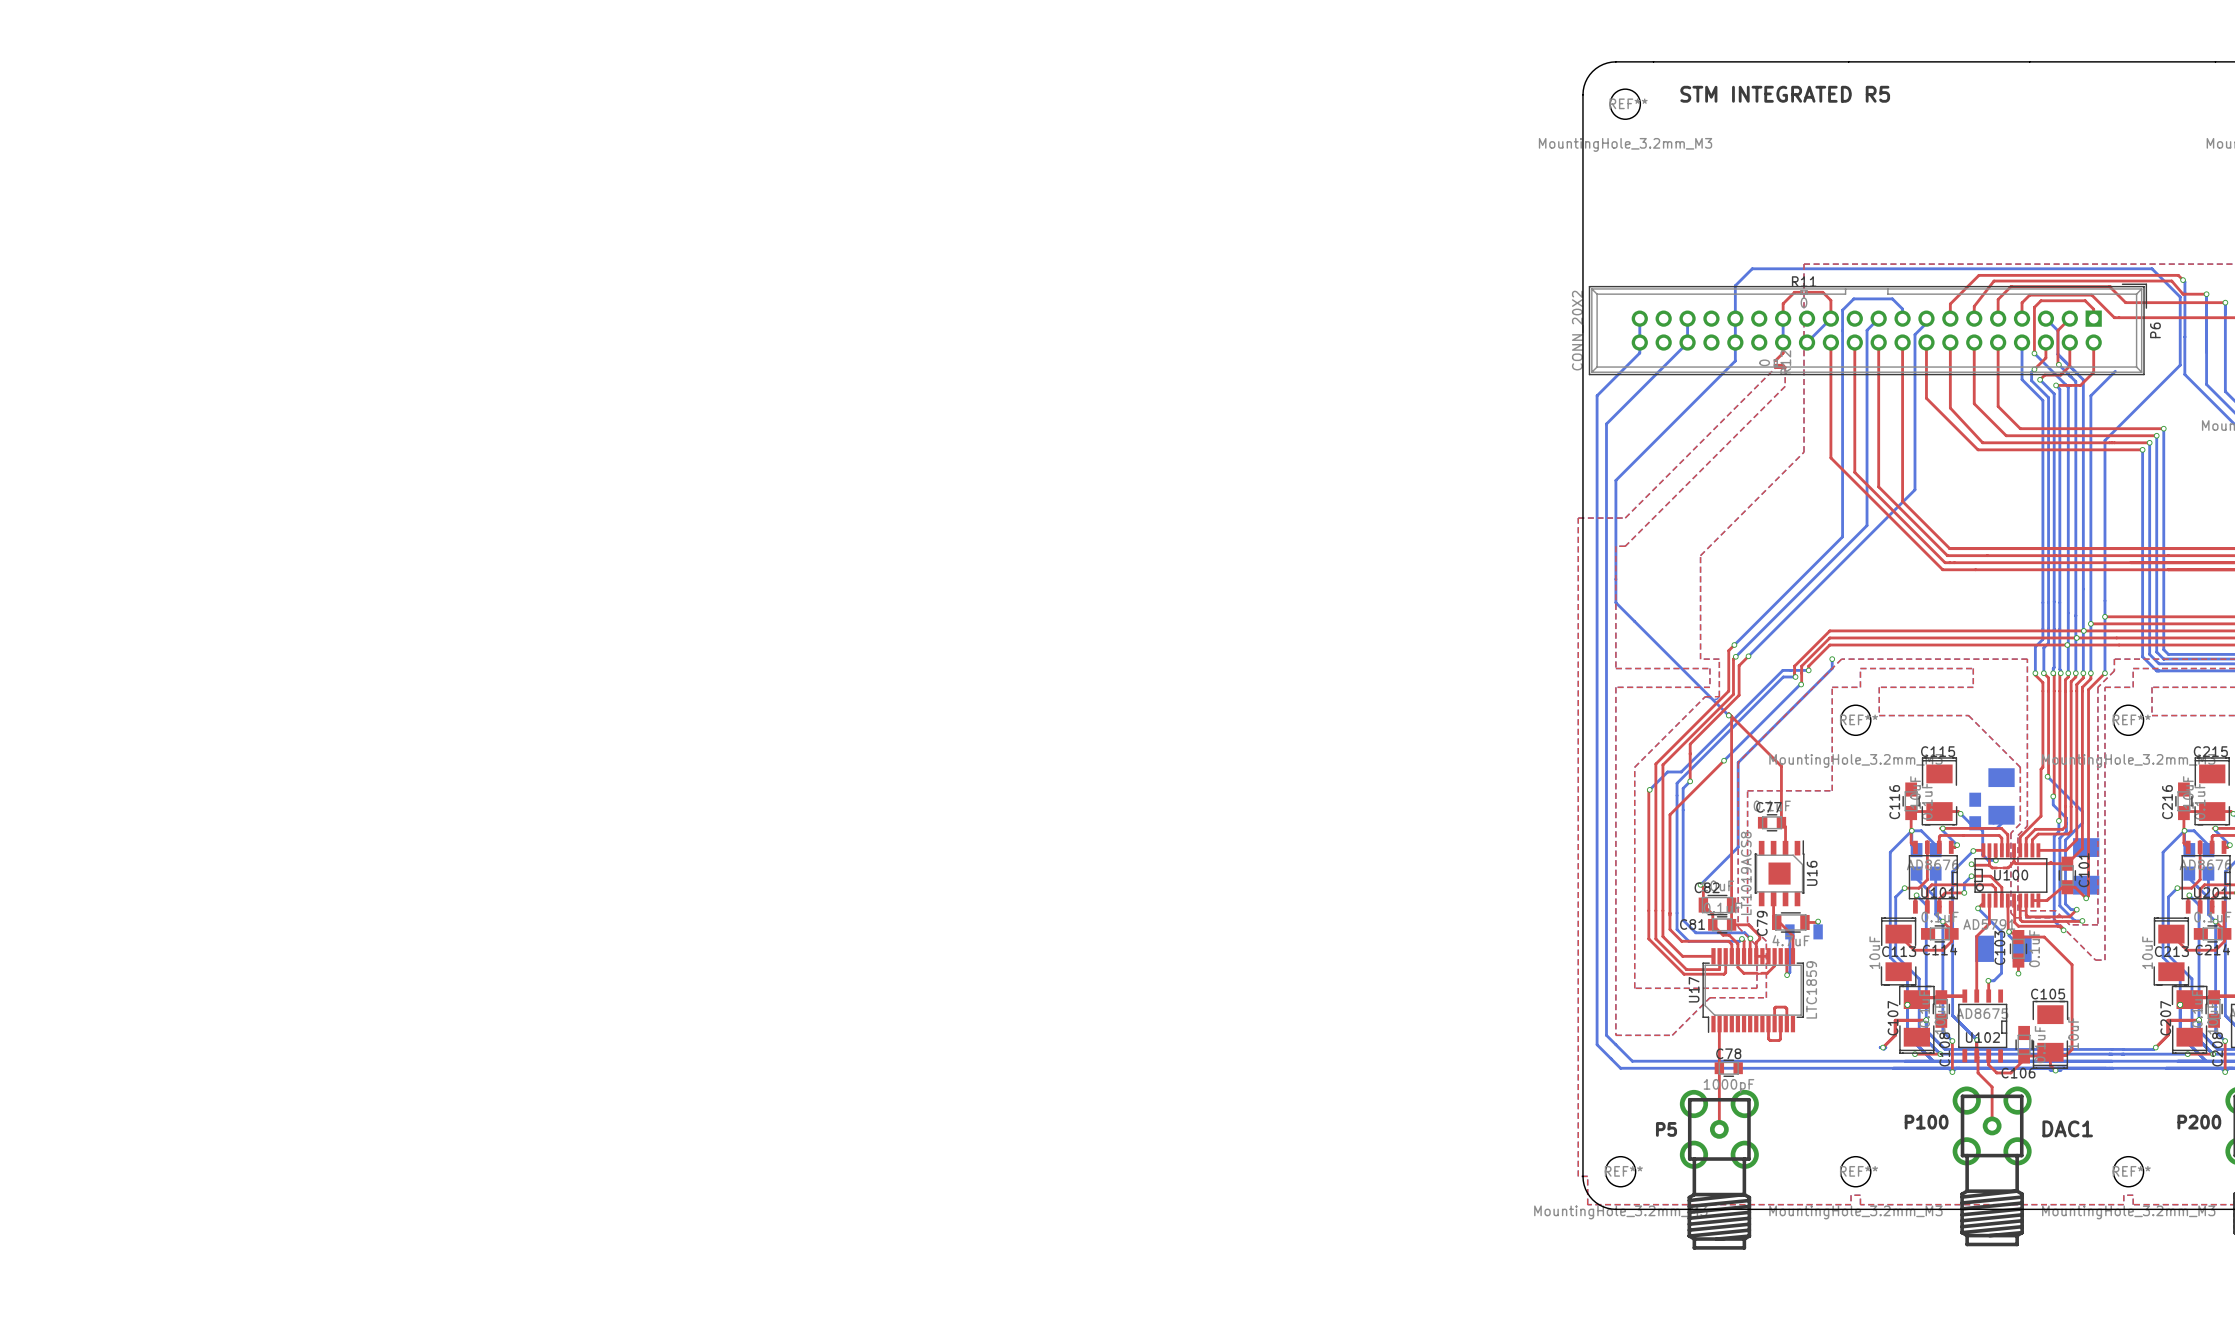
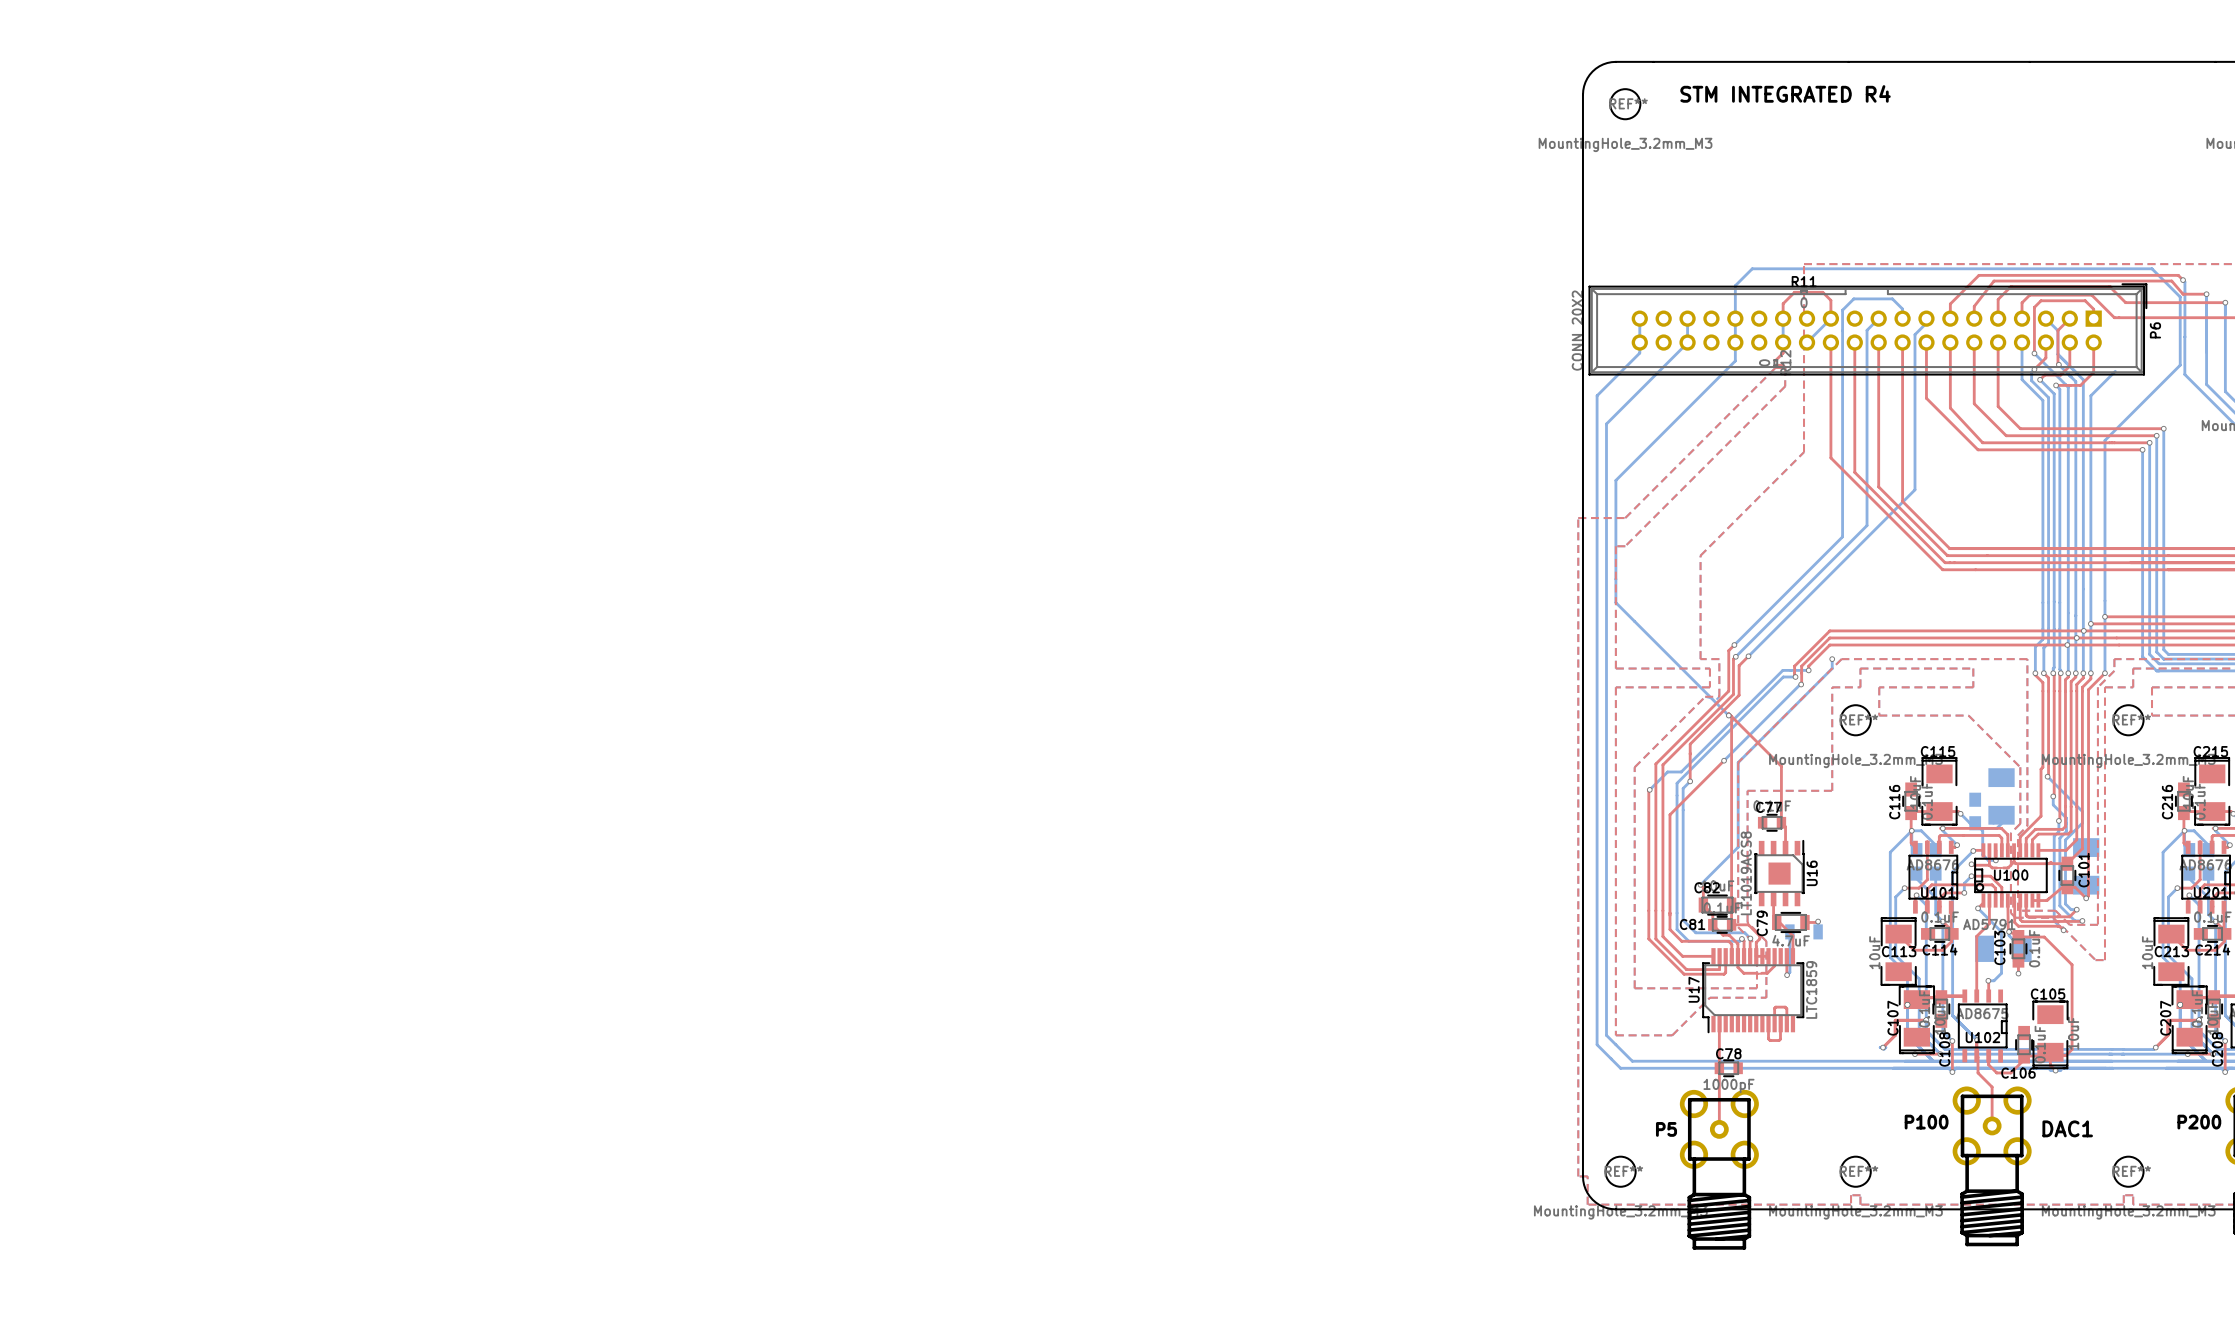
text: STM INTEGRATED R5 (1785, 94) -> STM INTEGRATED R4 (1785, 93)

